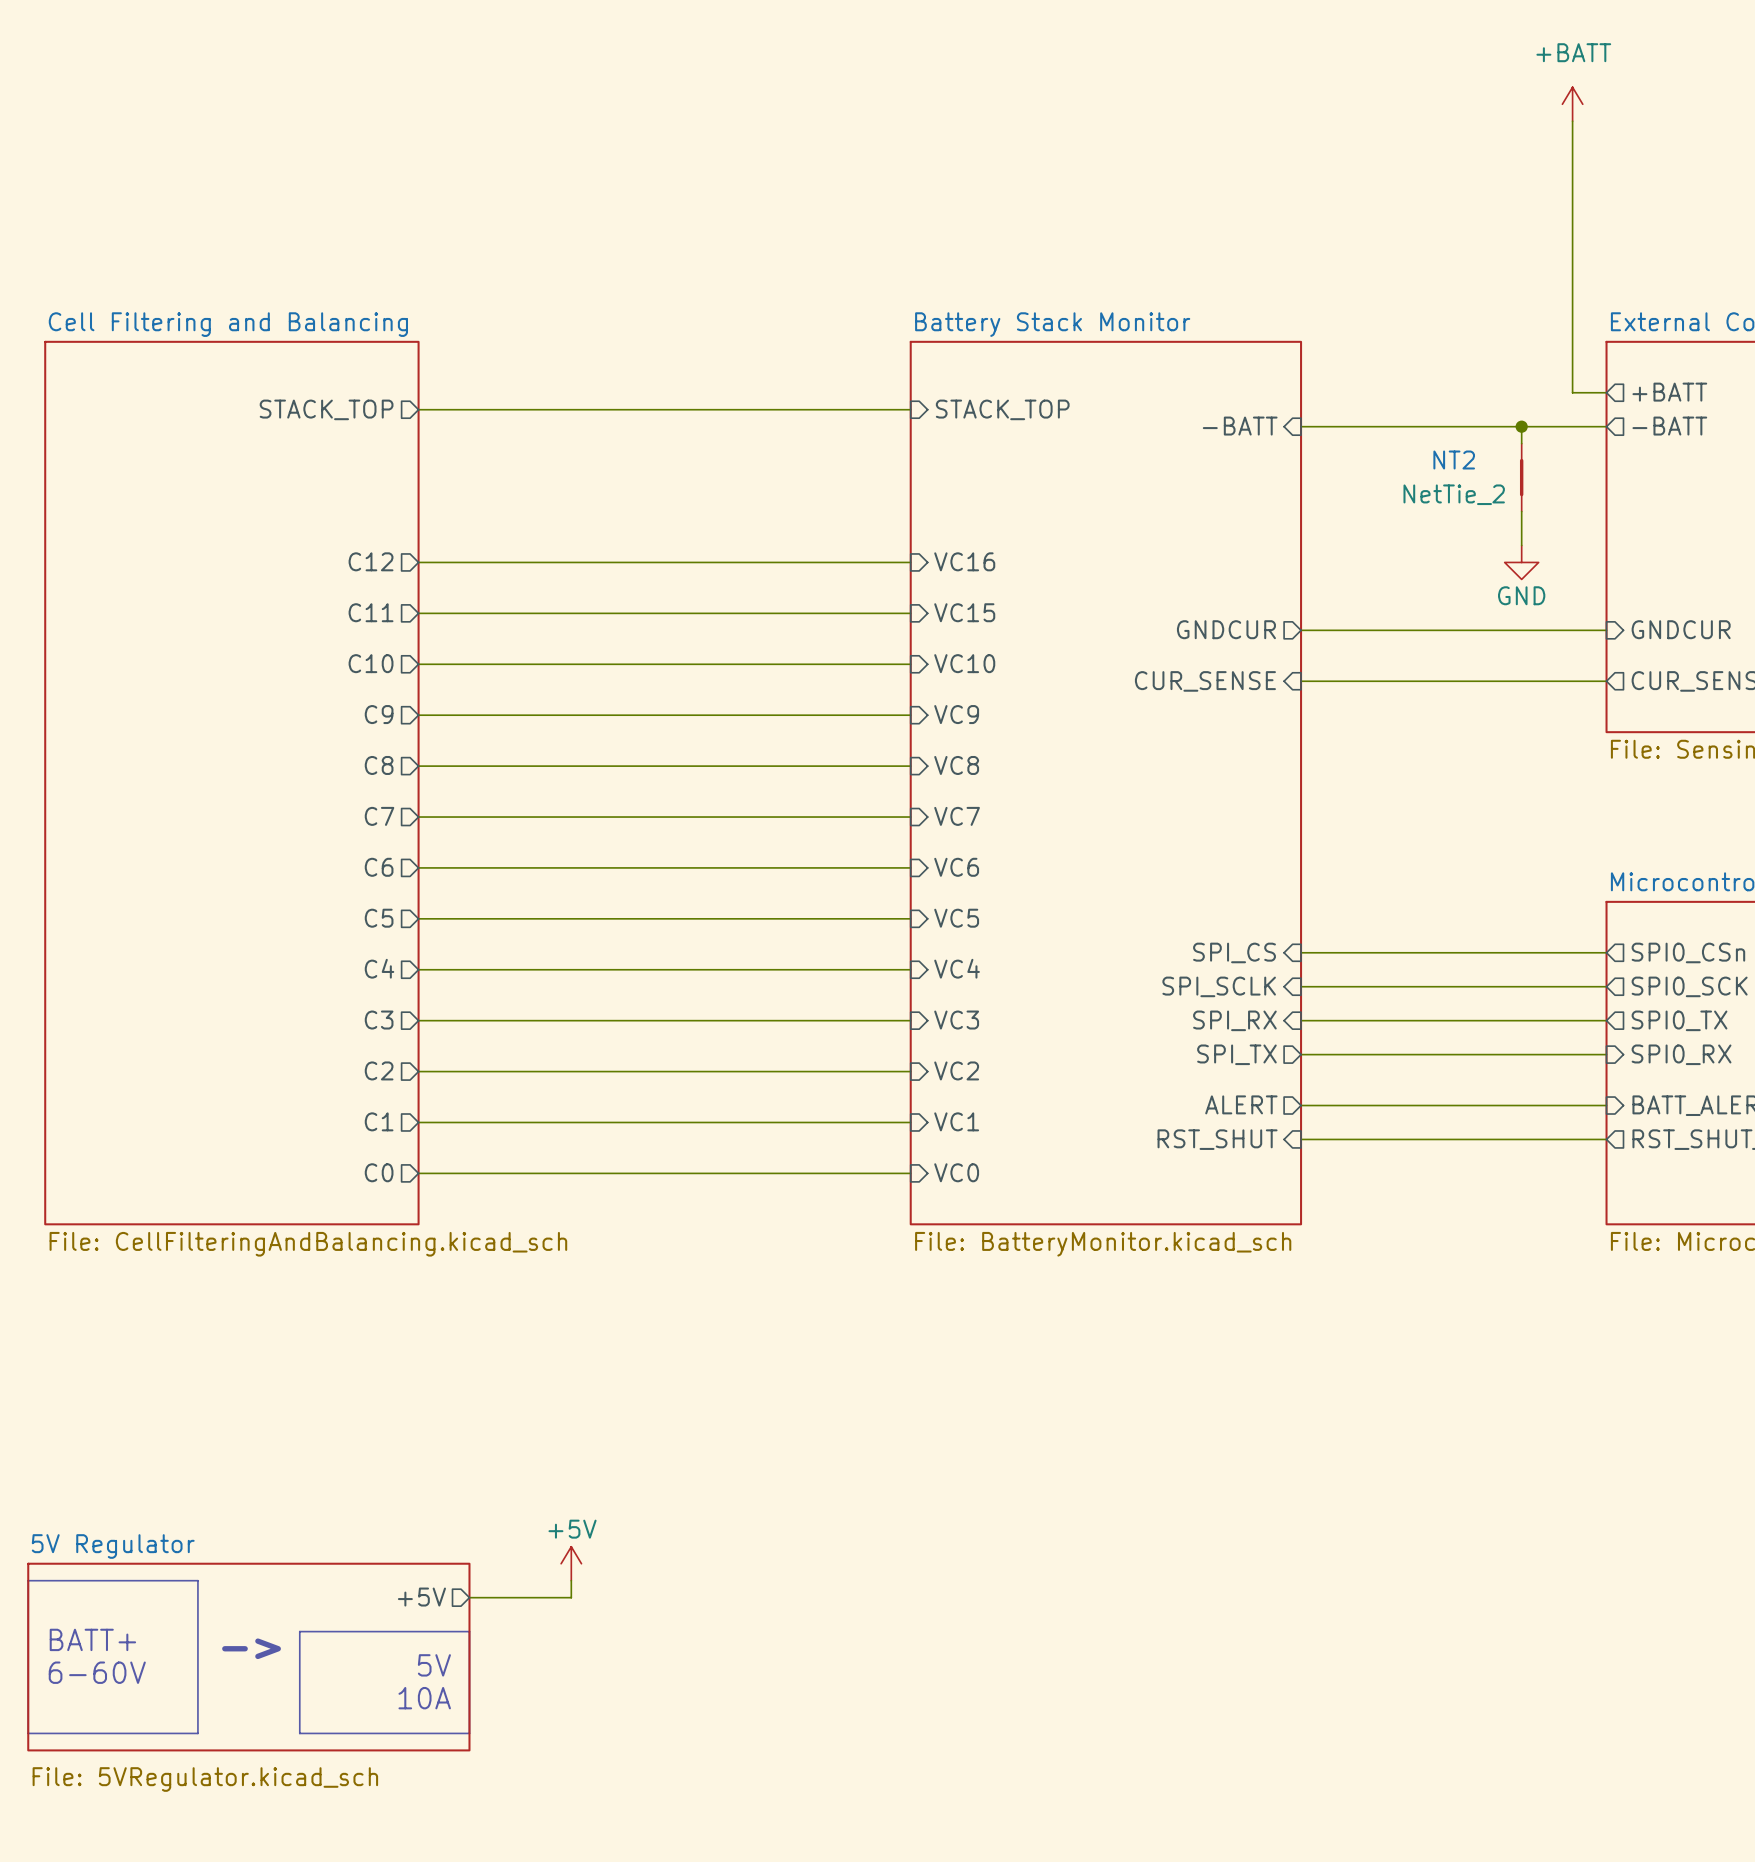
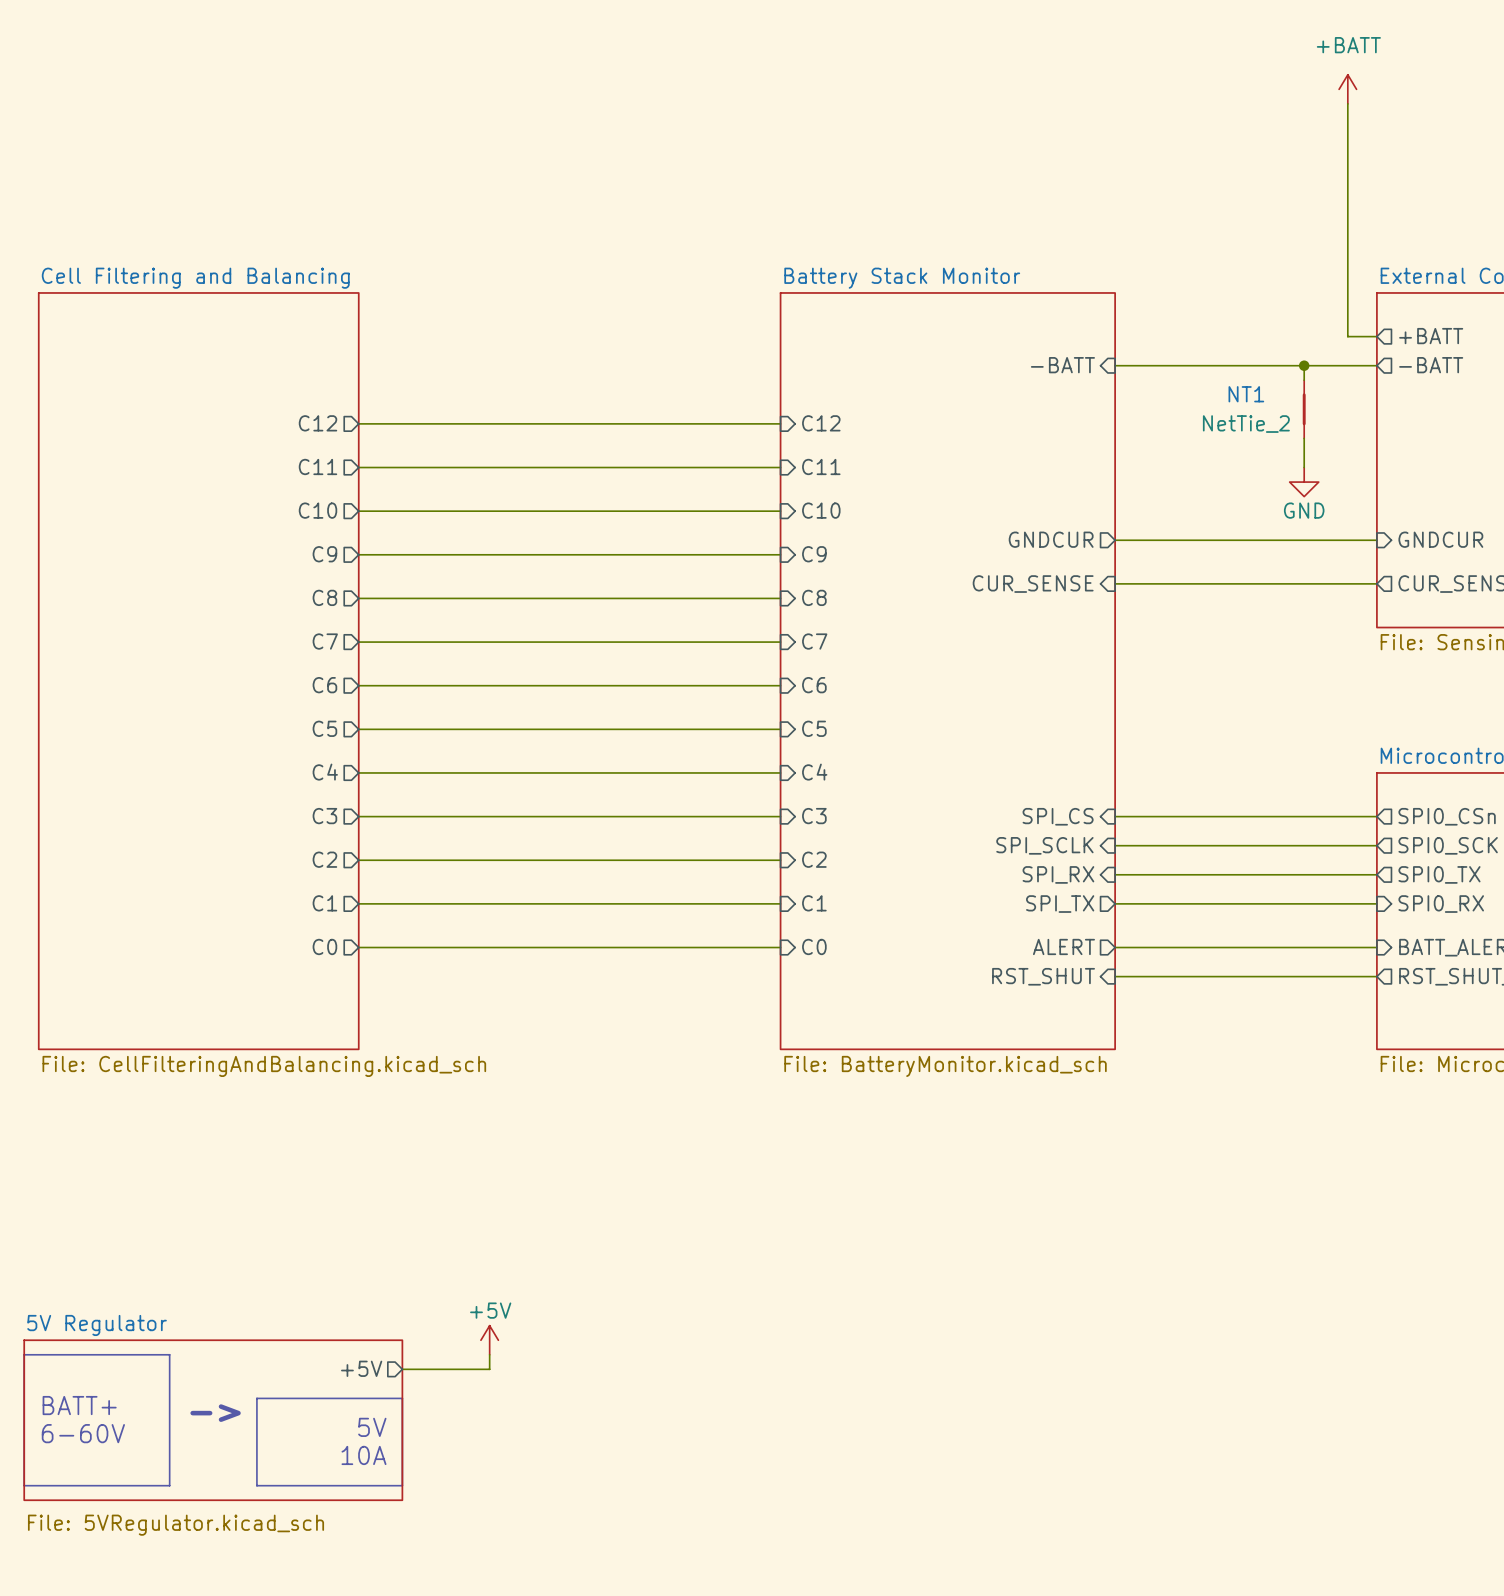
sheet pin: STACK_TOP (326, 409) -> none
wire: (418, 409) (910, 409) -> none
sheet pin: STACK_TOP (1002, 409) -> none
NT2 name: NT2 (1454, 460) -> NT1 (1246, 394)
sheet pin: none -> C12 (821, 423)
sheet pin: none -> C11 (821, 466)
sheet pin position: C12 (371, 561) -> C12 (318, 423)
sheet pin: VC16 (964, 561) -> none
wire: (418, 562) (910, 562) -> (358, 423) (780, 423)
sheet pin: none -> C10 (821, 510)
sheet pin position: C11 (371, 612) -> C11 (318, 466)
sheet pin: VC15 (964, 612) -> none
wire: (418, 613) (910, 613) -> (358, 467) (780, 467)
sheet pin: none -> C9 (814, 554)
sheet pin position: C10 (371, 663) -> C10 (318, 510)
sheet pin: VC10 (964, 663) -> none
wire: (418, 664) (910, 664) -> (358, 511) (780, 511)
sheet pin: none -> C8 (814, 597)
sheet pin position: C9 (379, 714) -> C9 (324, 554)
sheet pin: VC9 (956, 714) -> none
wire: (418, 715) (910, 715) -> (358, 554) (780, 554)
sheet pin: none -> C7 (814, 641)
sheet pin position: C8 (379, 765) -> C8 (324, 597)
sheet pin: VC8 (956, 765) -> none
wire: (418, 766) (910, 766) -> (358, 598) (780, 598)
sheet pin: none -> C6 (814, 685)
sheet pin position: C7 (379, 816) -> C7 (325, 641)
sheet pin: VC7 (957, 816) -> none
wire: (418, 817) (910, 817) -> (358, 642) (780, 642)
sheet pin: none -> C5 (814, 728)
sheet pin position: C6 (379, 867) -> C6 (324, 685)
wire: (418, 867) (910, 867) -> (358, 685) (780, 685)
sheet pin: VC6 (956, 867) -> none
sheet pin: none -> C4 (814, 772)
sheet pin position: C5 (379, 918) -> C5 (324, 728)
wire: (418, 918) (910, 918) -> (358, 729) (780, 729)
sheet pin: VC5 (956, 918) -> none
sheet pin: none -> C3 (814, 816)
sheet pin position: C4 (379, 968) -> C4 (325, 772)
sheet pin: VC4 (957, 968) -> none
wire: (418, 969) (910, 969) -> (358, 772) (780, 772)
sheet pin: none -> C2 (814, 859)
sheet pin position: C3 (379, 1020) -> C3 (324, 816)
wire: (418, 1020) (910, 1020) -> (358, 816) (780, 816)
sheet pin: VC3 (956, 1020) -> none
sheet pin: none -> C1 (814, 903)
sheet pin position: C2 (379, 1070) -> C2 (324, 859)
sheet pin: VC2 (956, 1070) -> none
wire: (418, 1071) (910, 1071) -> (358, 860) (780, 860)
sheet pin: none -> C0 (814, 946)
sheet pin position: C1 (379, 1121) -> C1 (324, 903)
sheet pin: VC1 (956, 1121) -> none
wire: (418, 1122) (910, 1122) -> (358, 903) (780, 903)
sheet pin position: C0 (379, 1172) -> C0 (324, 946)
sheet pin: VC0 (956, 1172) -> none
wire: (418, 1173) (910, 1173) -> (358, 947) (780, 947)

